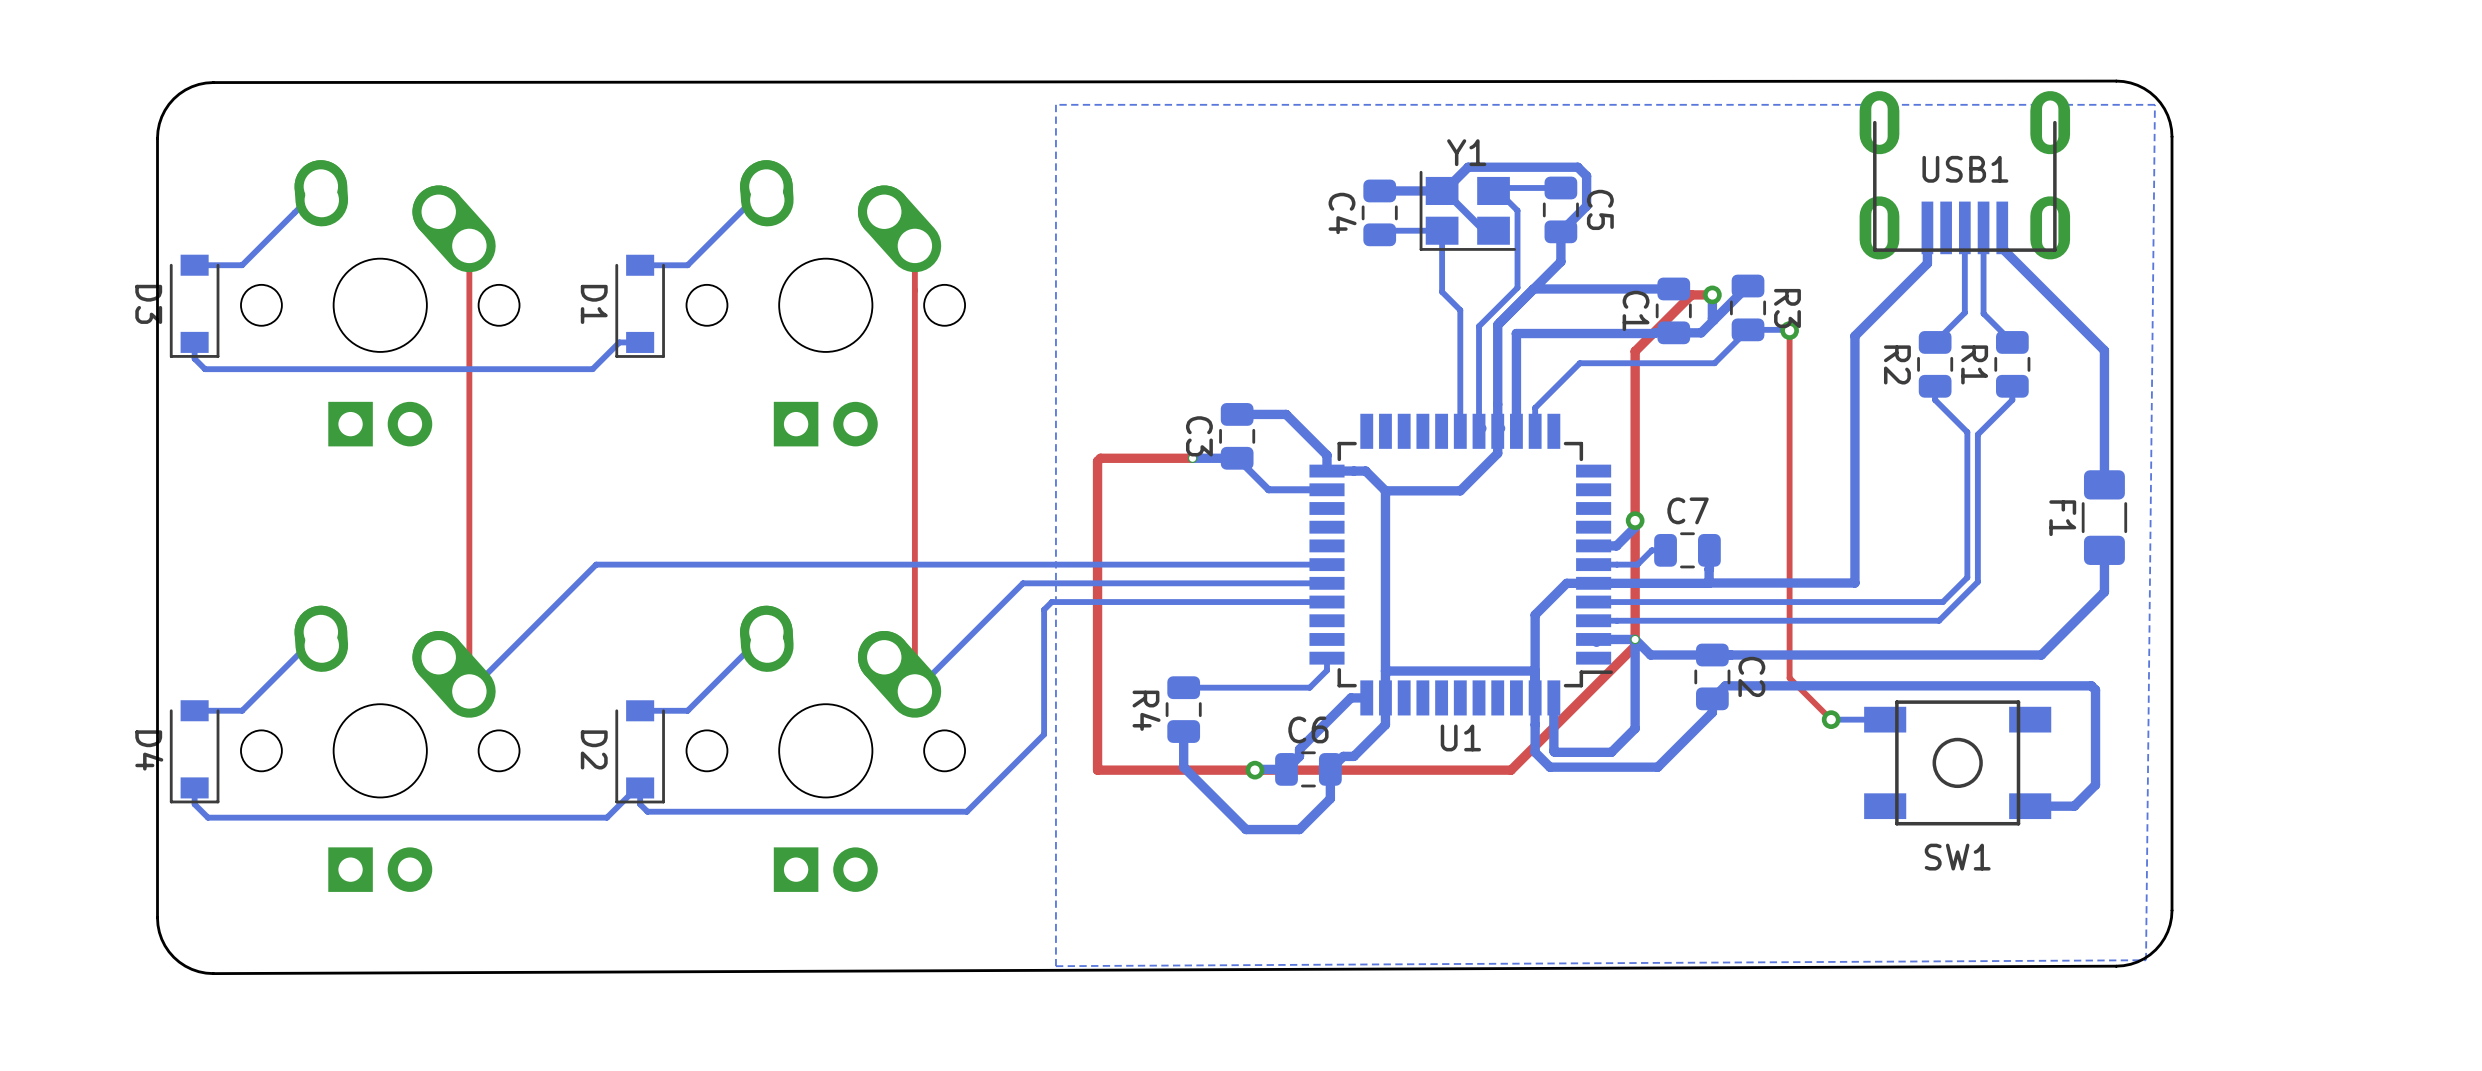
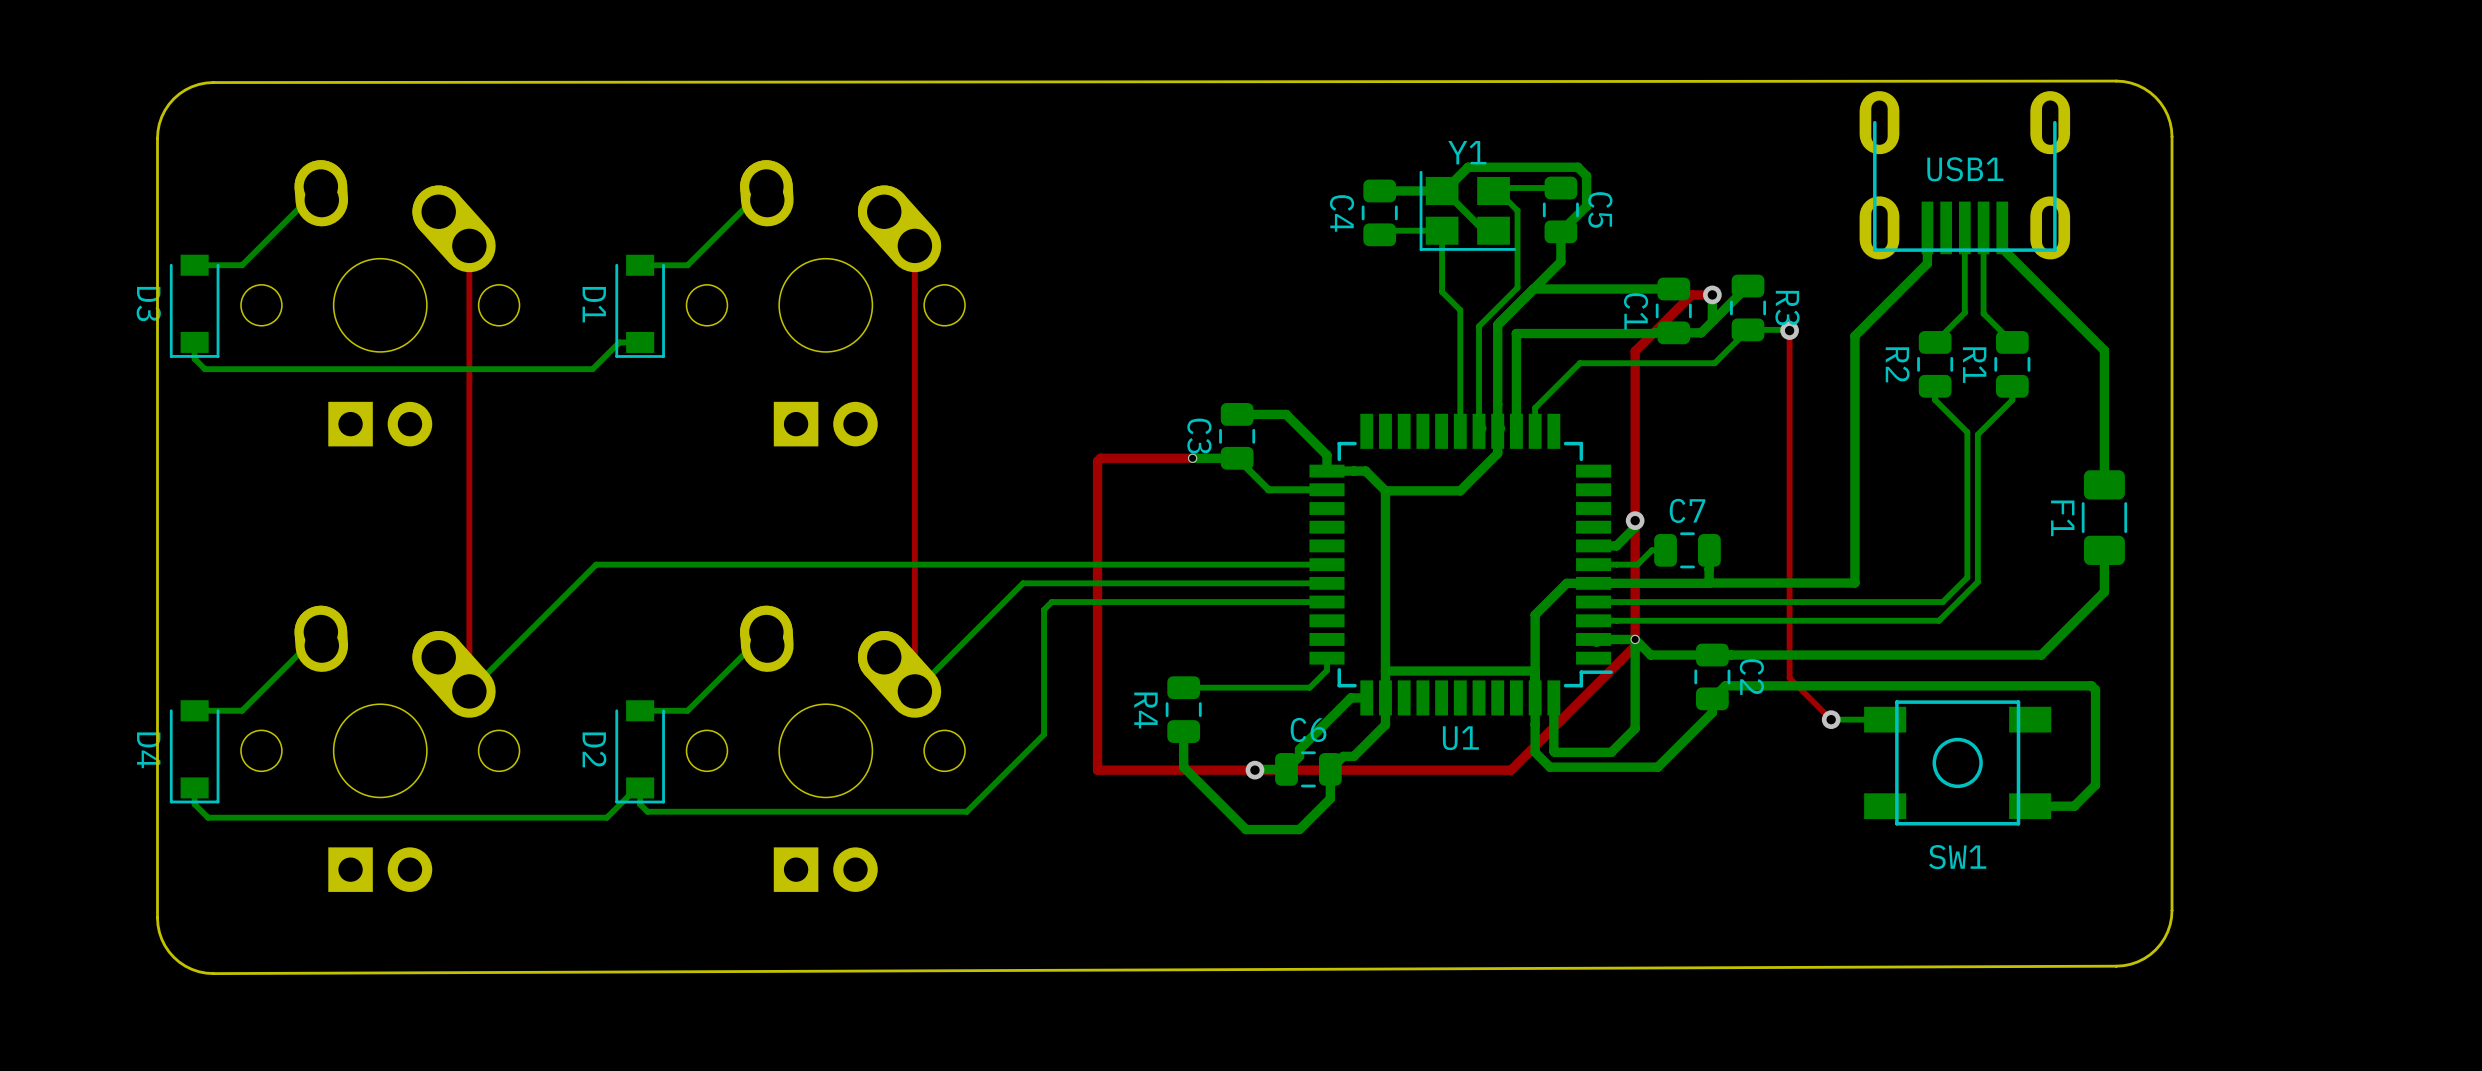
bottom zone outline: (2154, 104) (1055, 104) (1055, 966) (2146, 960) (2154, 104) -> none

